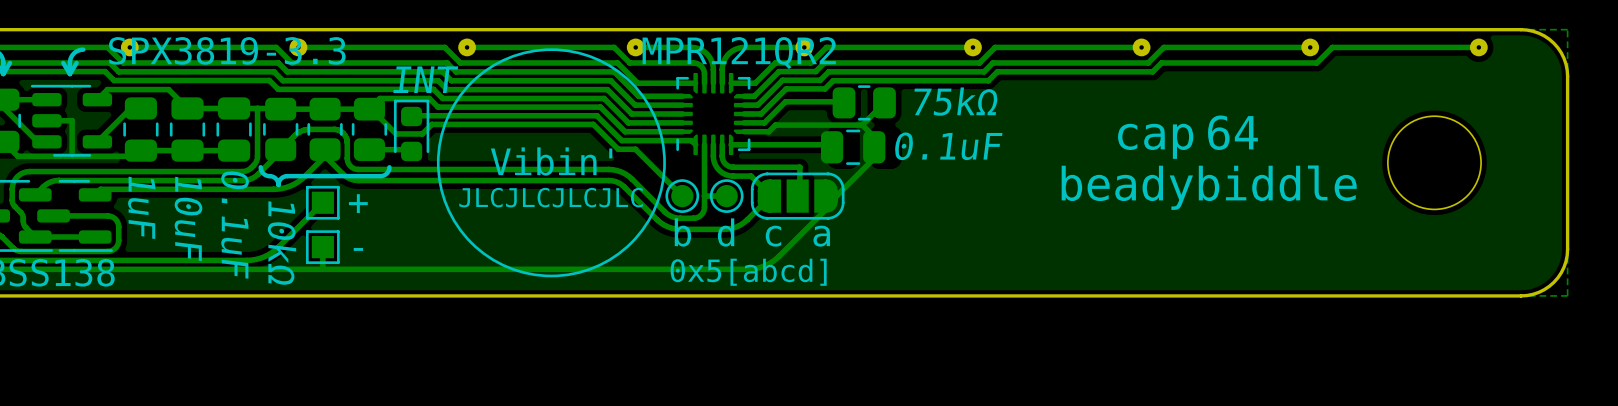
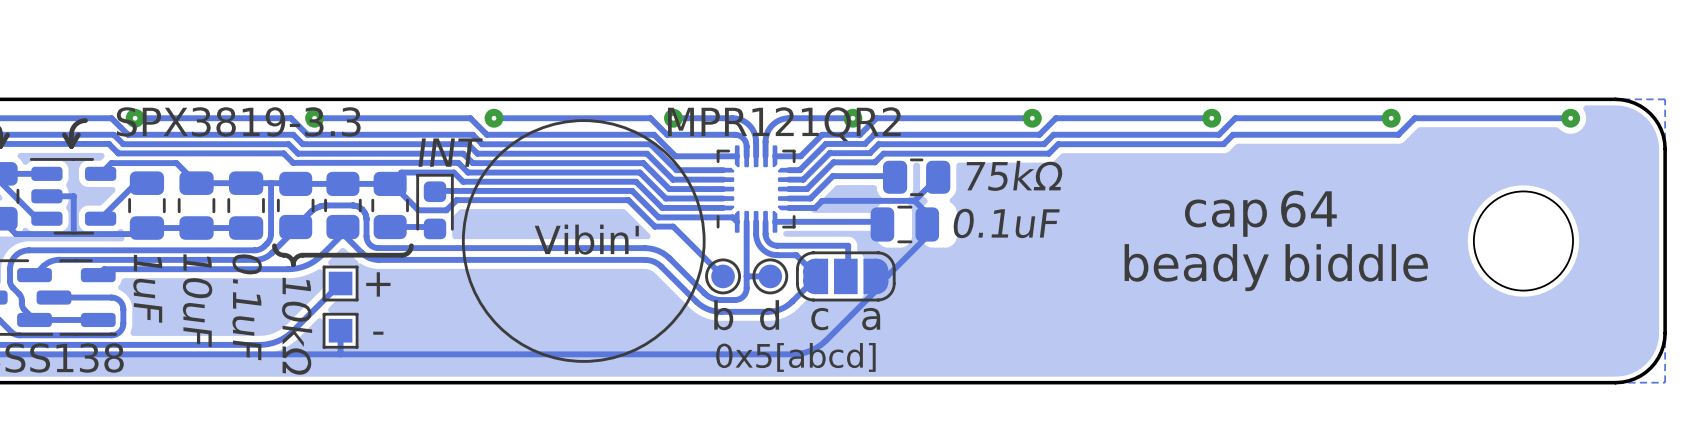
text: JLCJLCJLCJLC (551, 197) -> none

